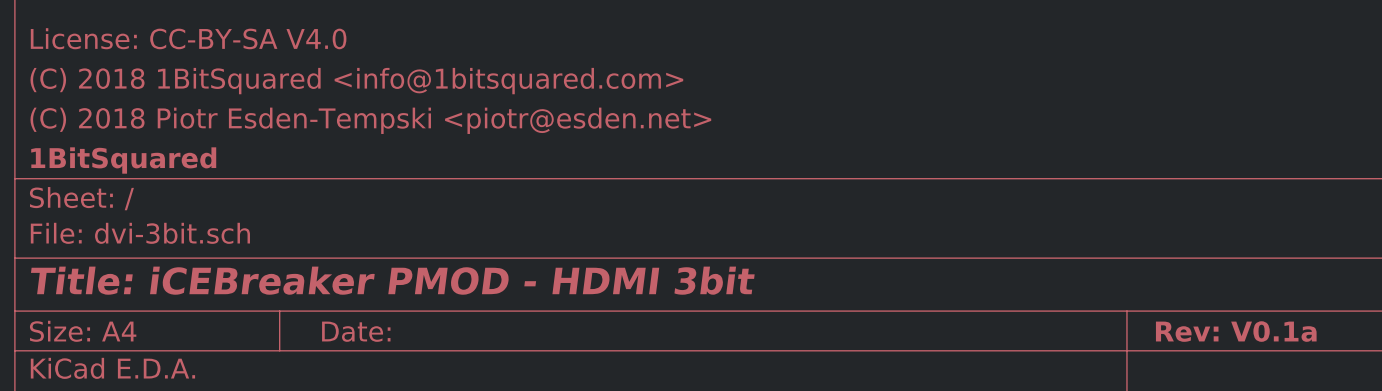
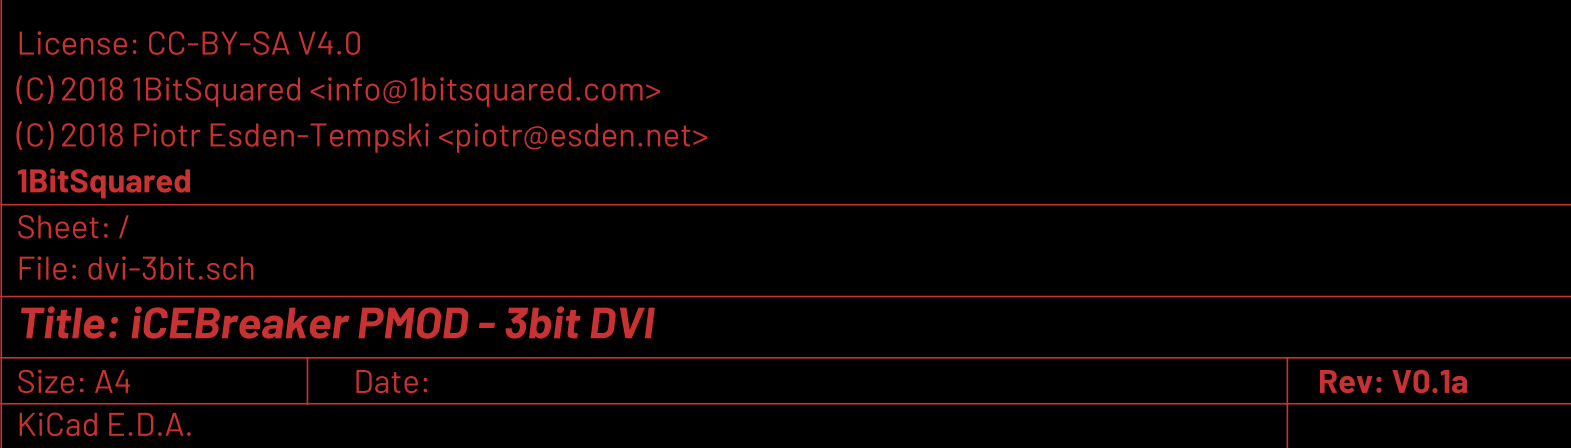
title block: Title: iCEBreaker PMOD - HDMI 3bit (392, 280) -> Title: iCEBreaker PMOD - 3bit DVI (337, 322)

